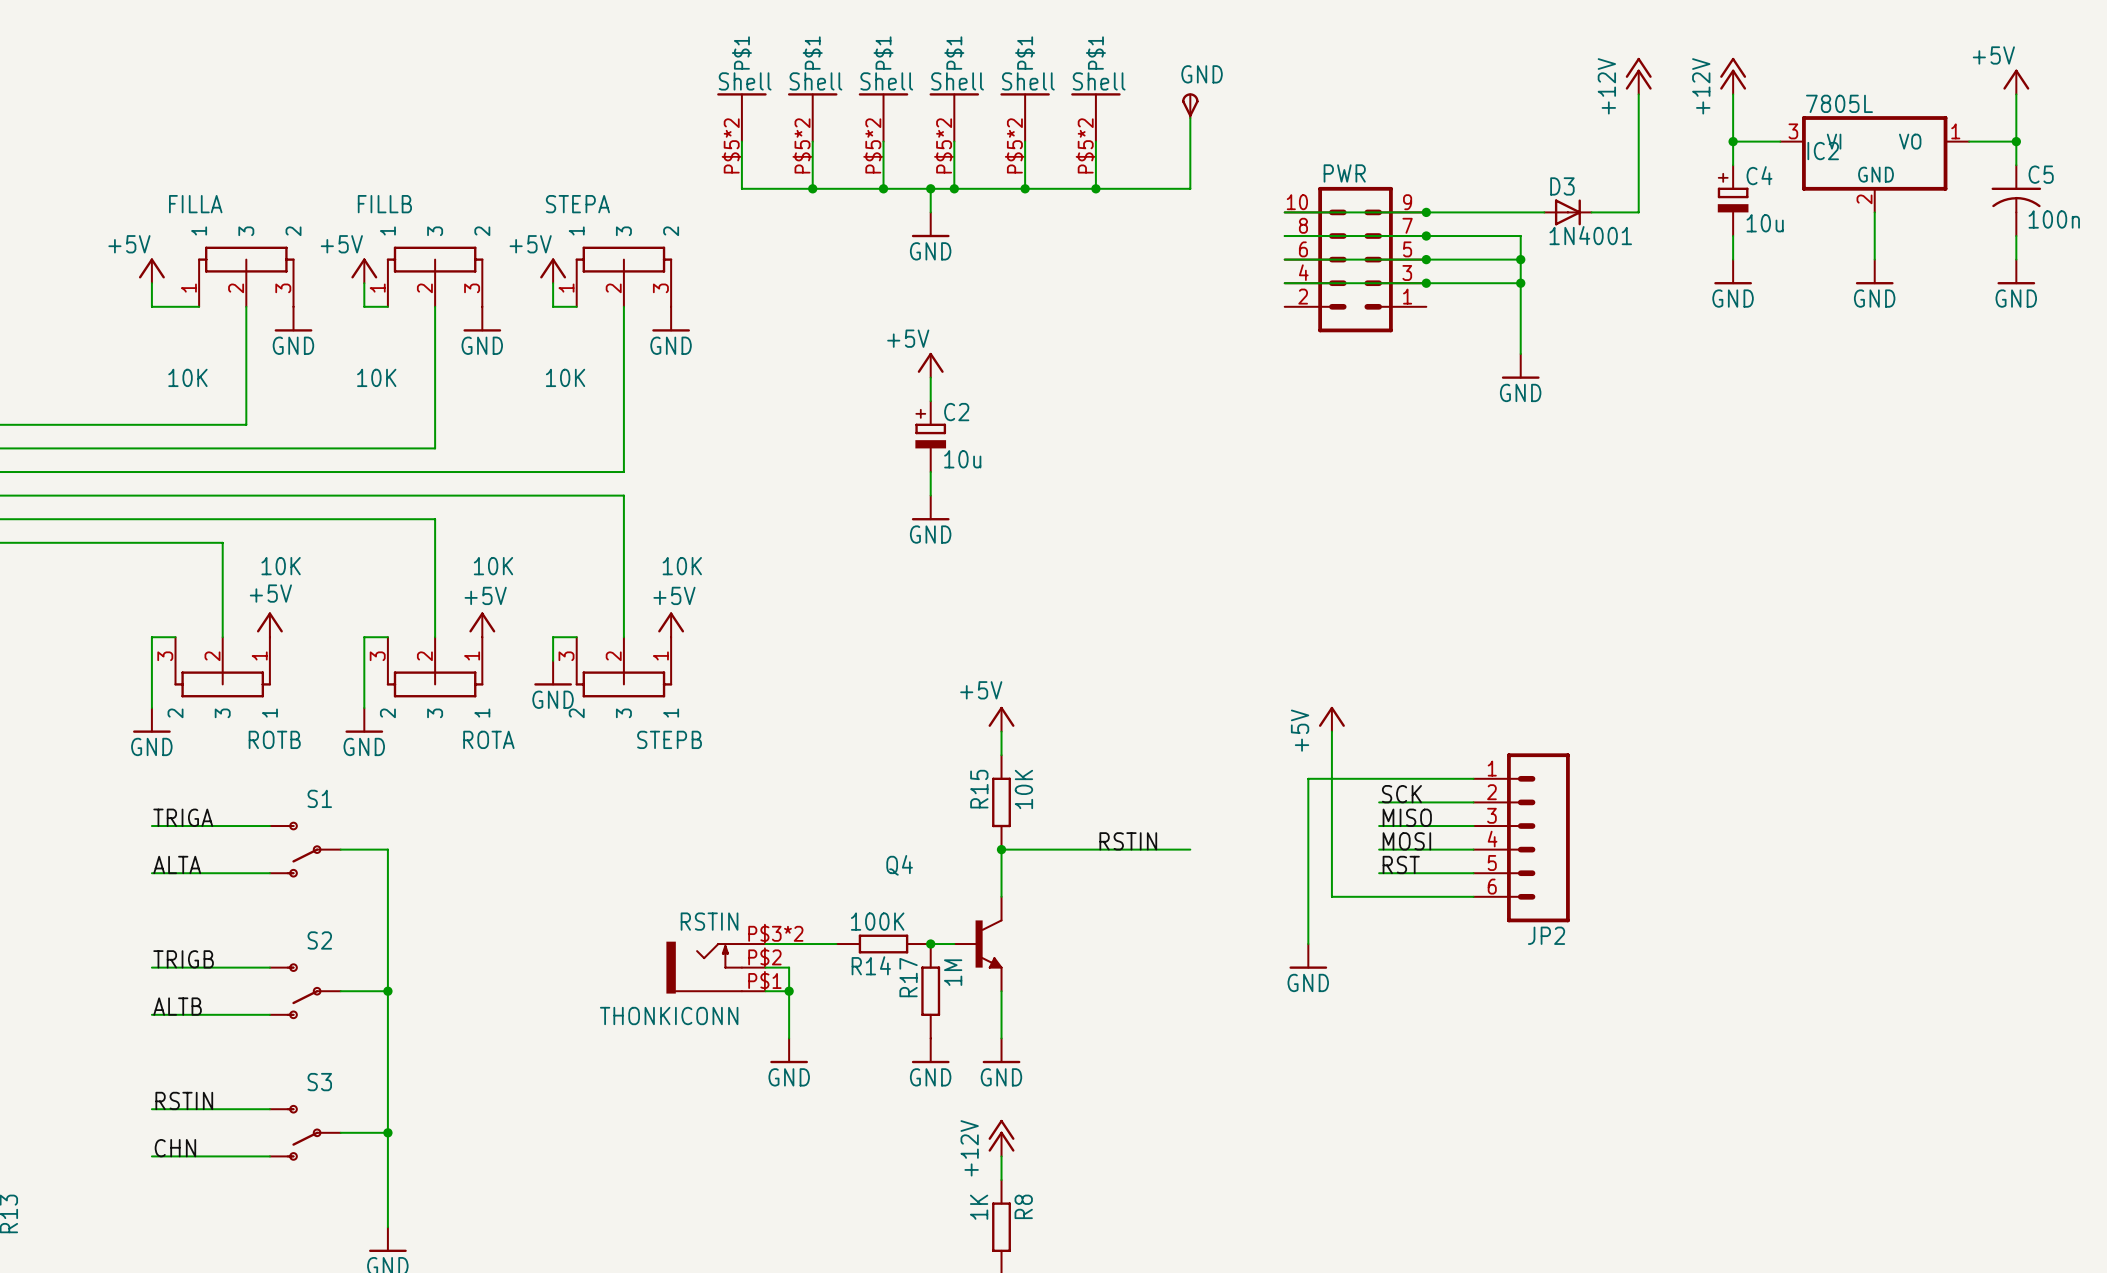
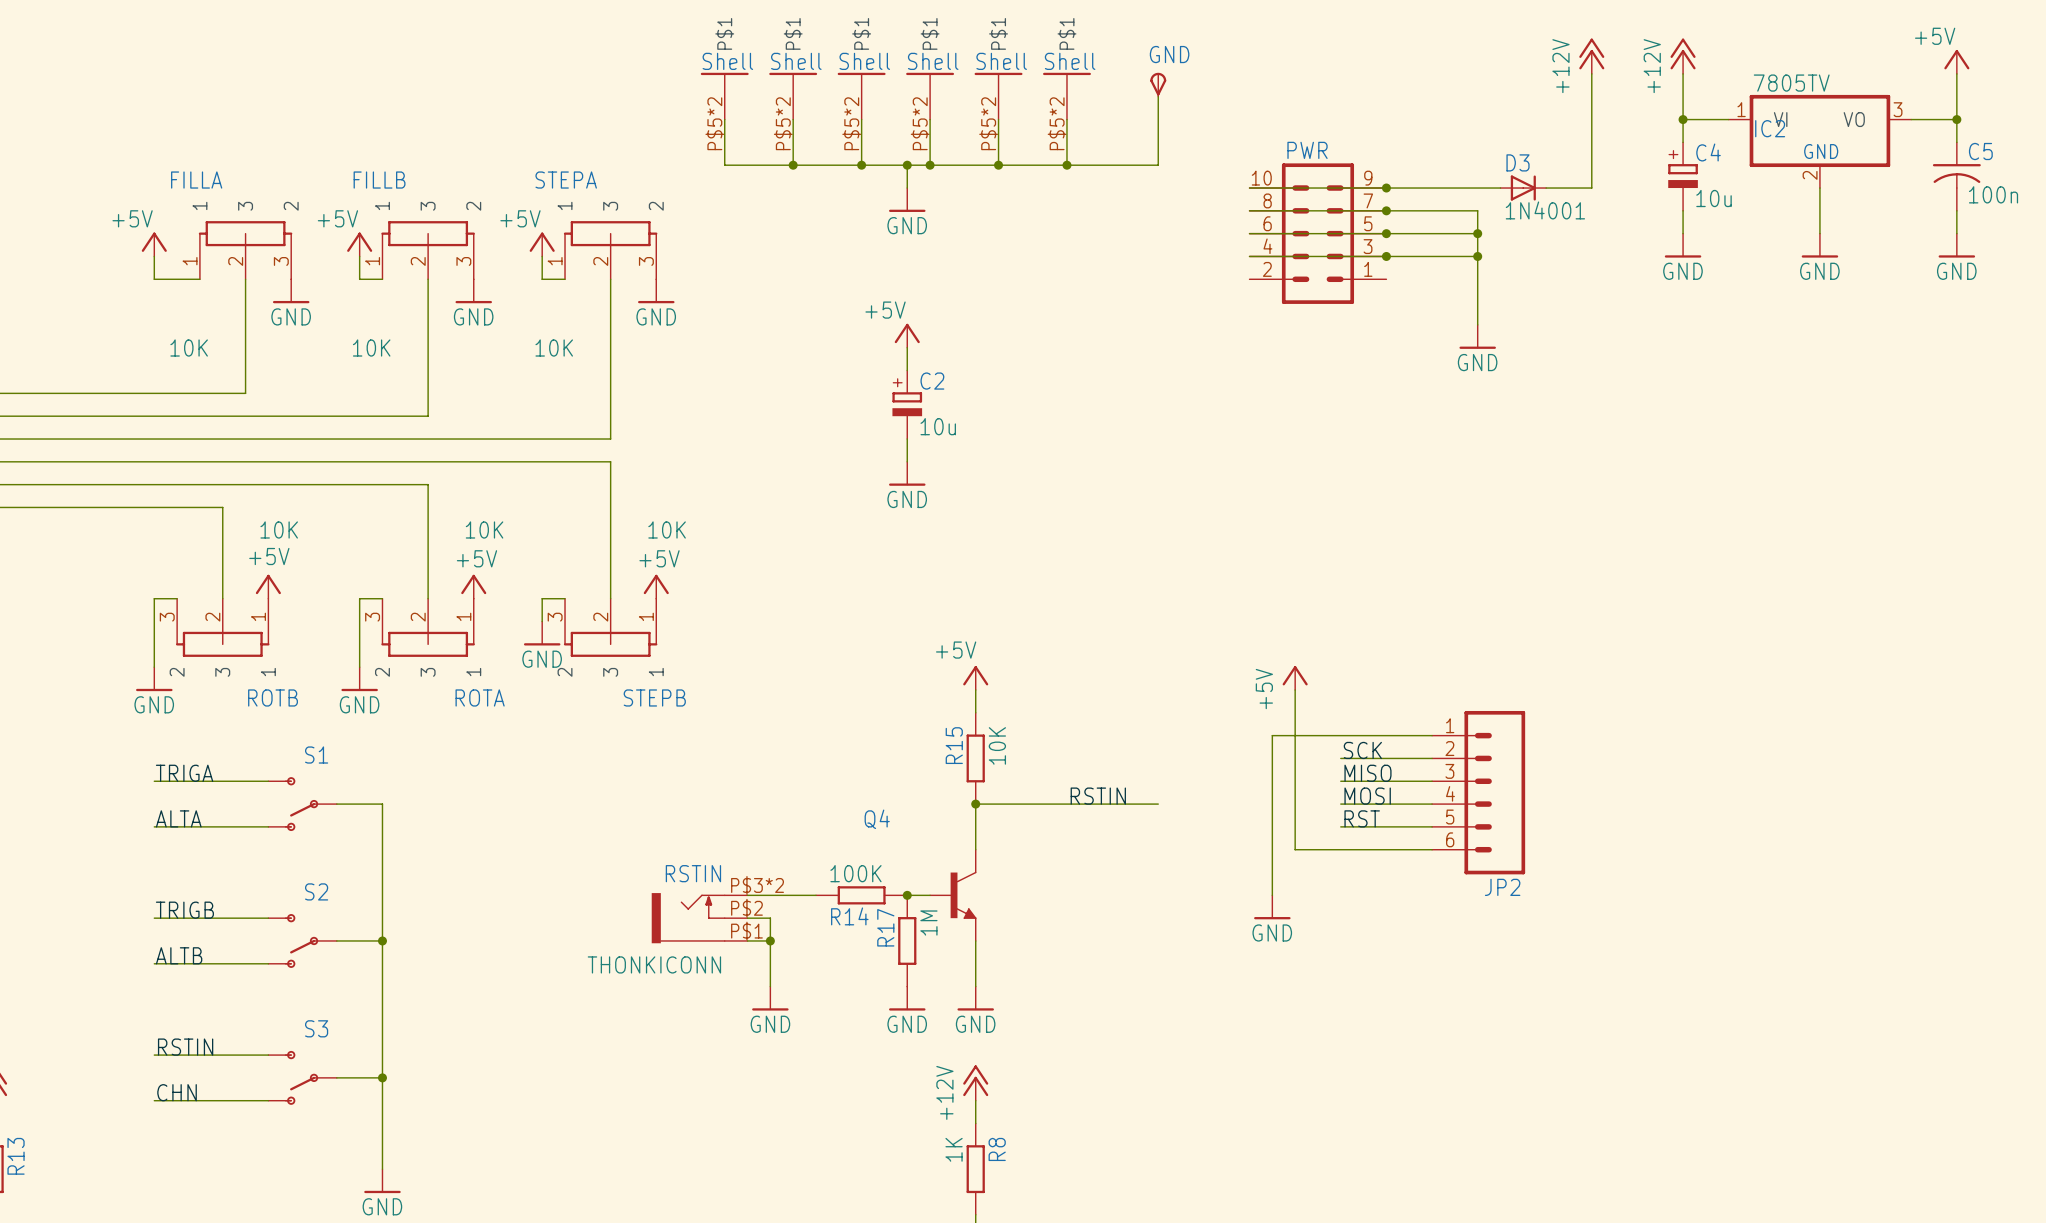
IC2 value: 7805L (1839, 103) -> 7805TV (1791, 83)
IC2 pin number: 3 (1793, 131) -> 1 (1741, 109)
IC2 pin number: 1 (1955, 131) -> 3 (1898, 109)

